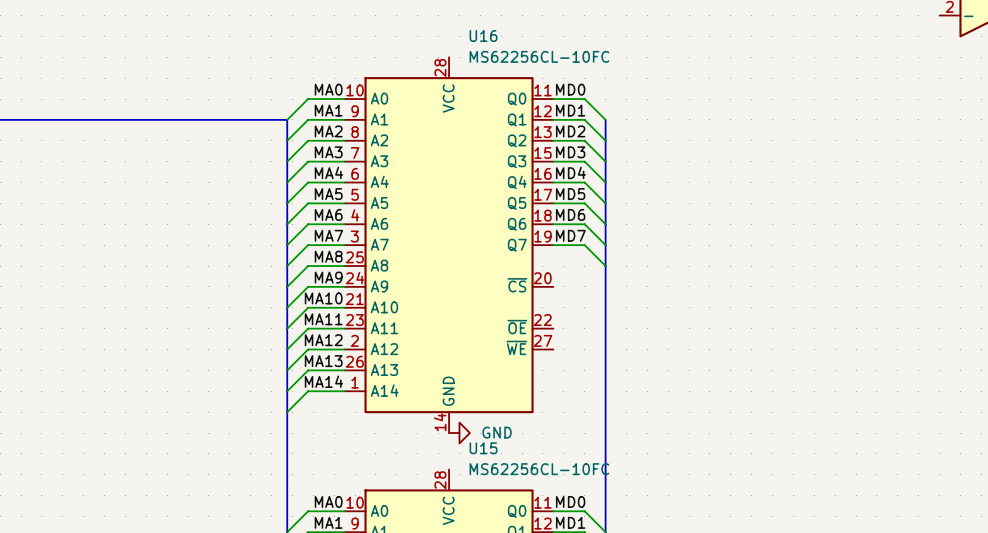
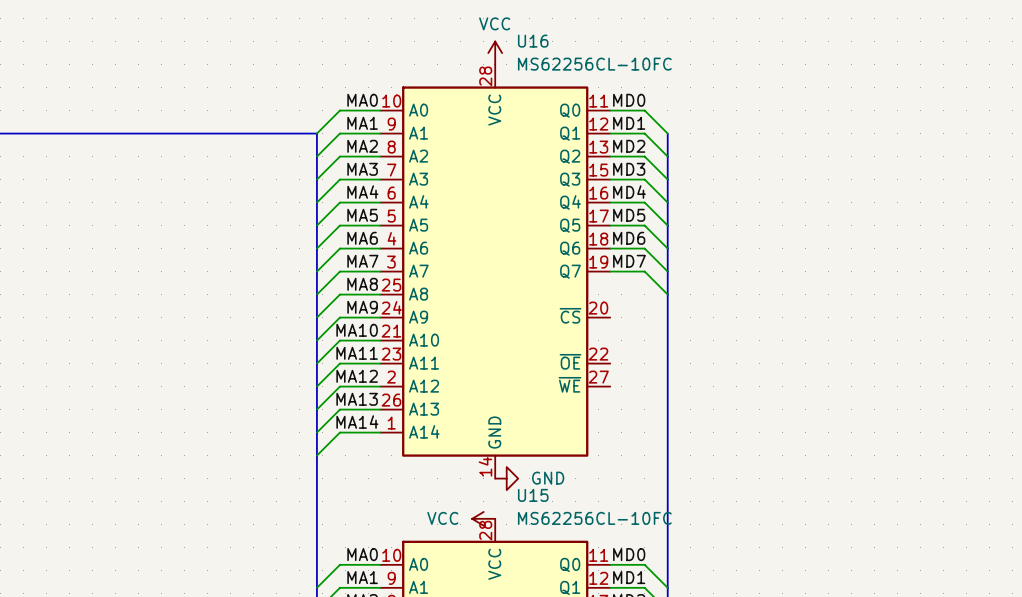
power symbol: none -> VCC (495, 53)
power symbol: none -> VCC (483, 518)

